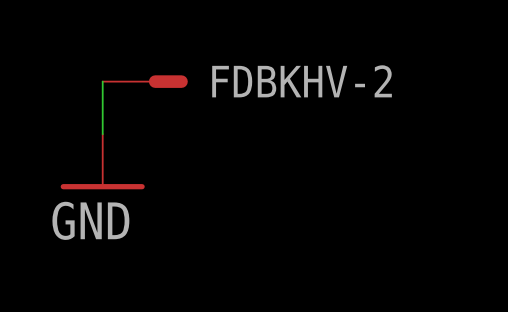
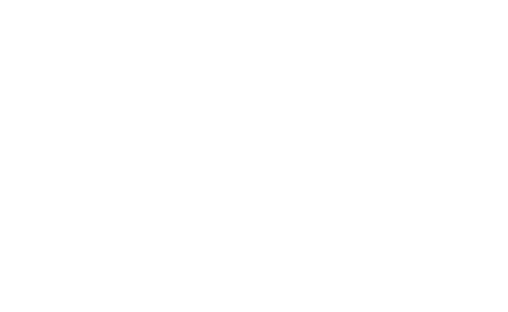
wire: (102, 81) (102, 134) -> none
FDBKHV-2: (145, 81) -> none
power symbol: GND (102, 161) -> none

